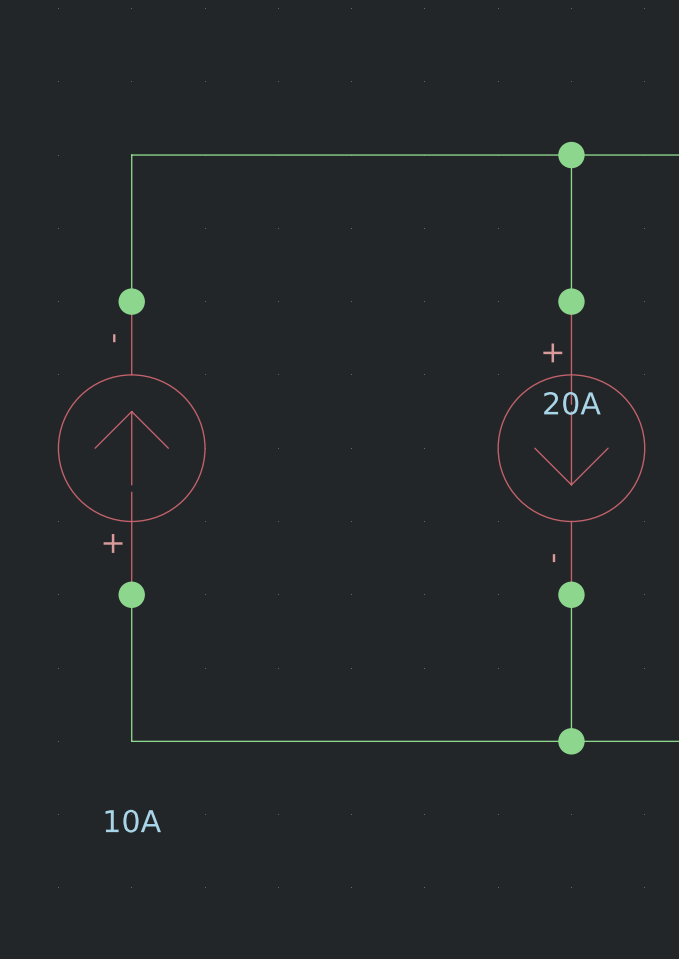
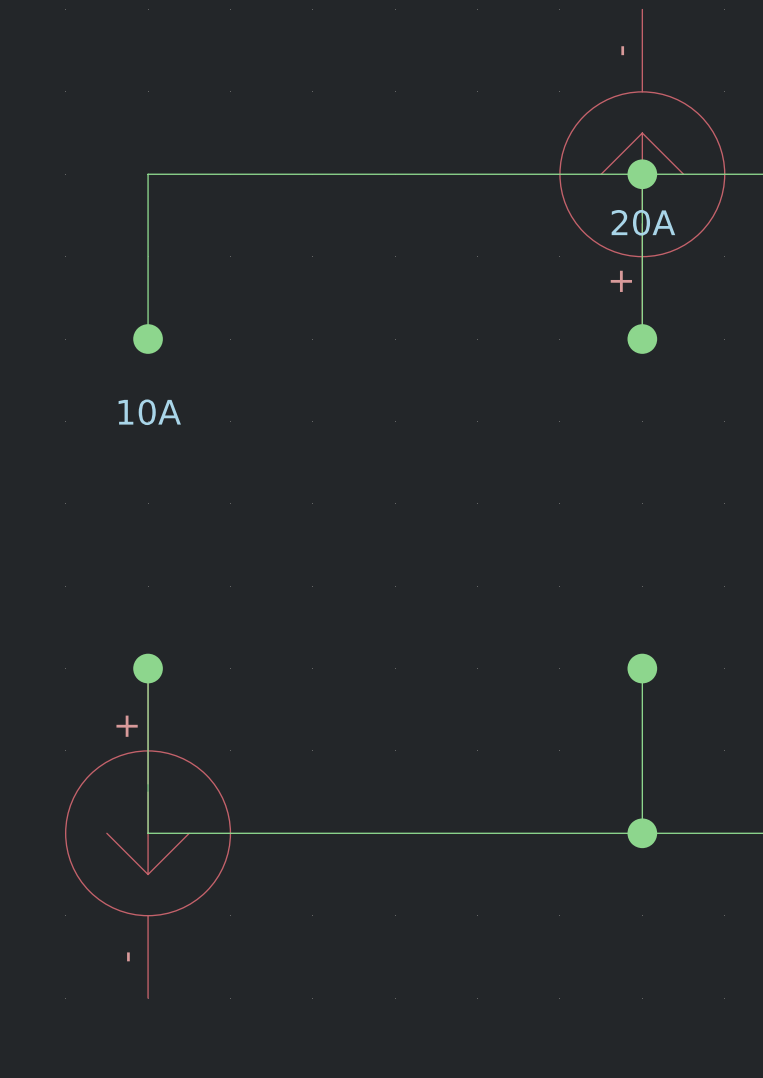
part rotation: 0° (131, 448) -> 180° (148, 833)
part position: (131, 448) -> (148, 833)
part rotation: 0° (571, 448) -> 180° (642, 174)
part position: (571, 448) -> (642, 174)

